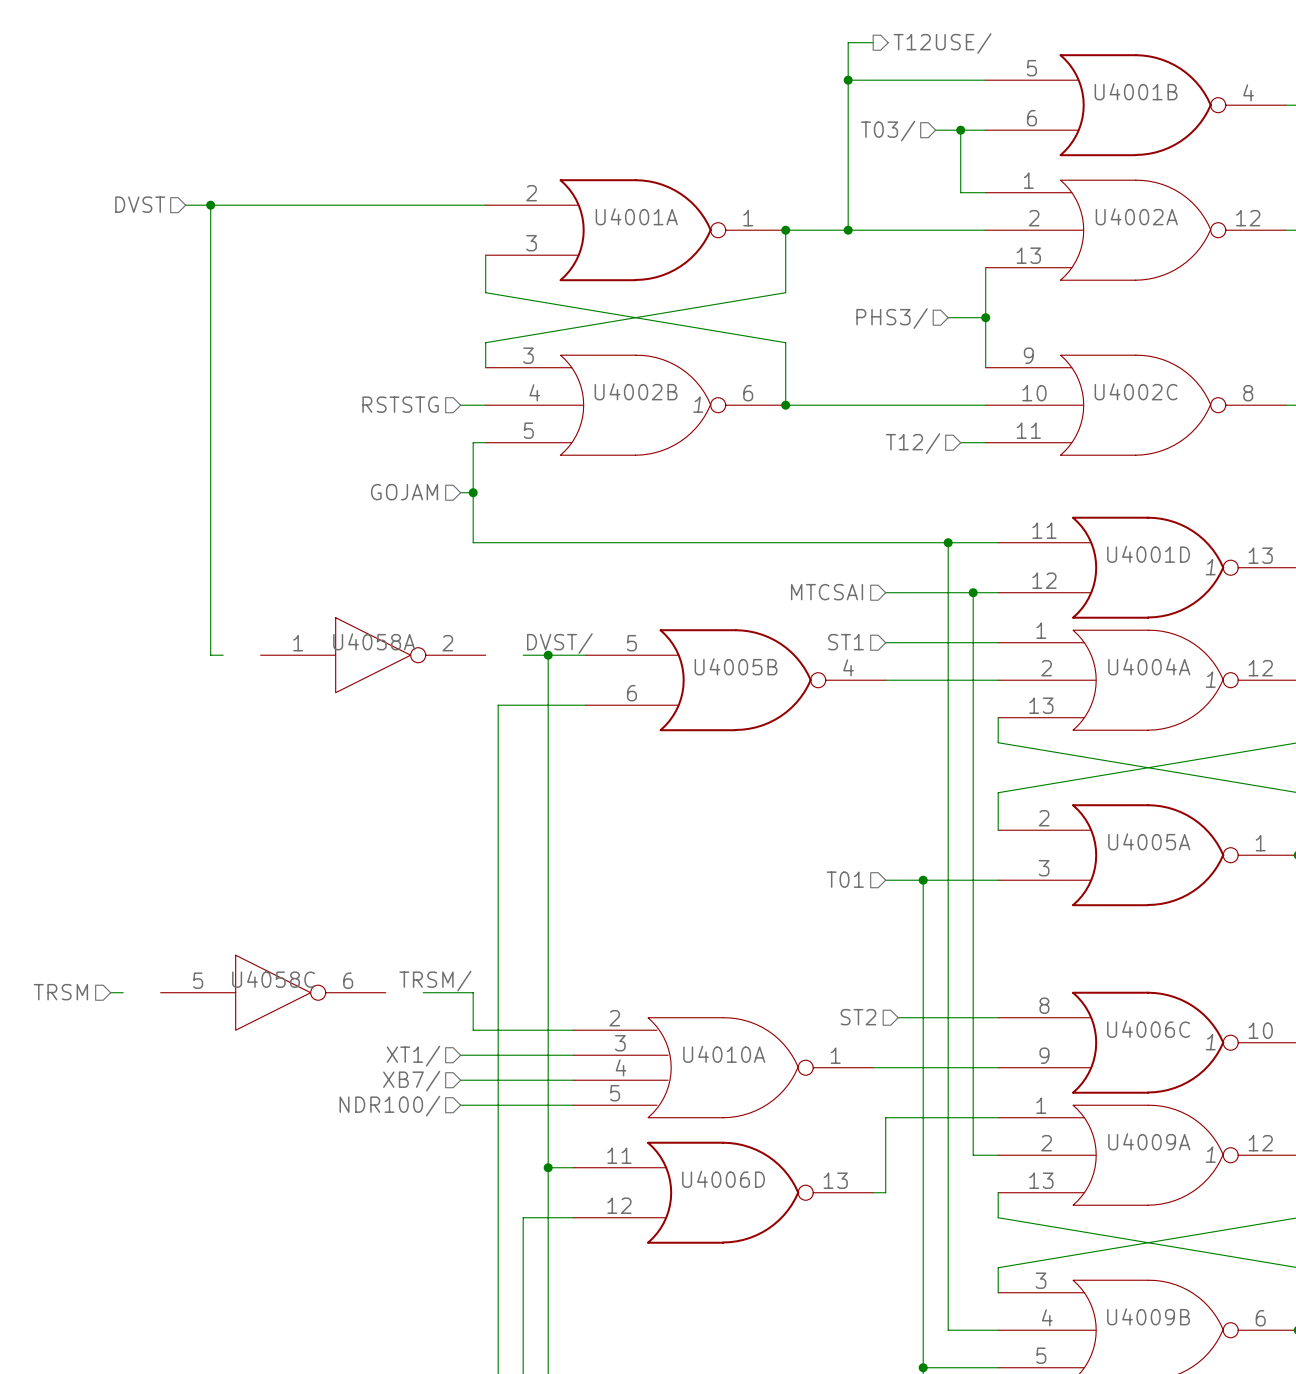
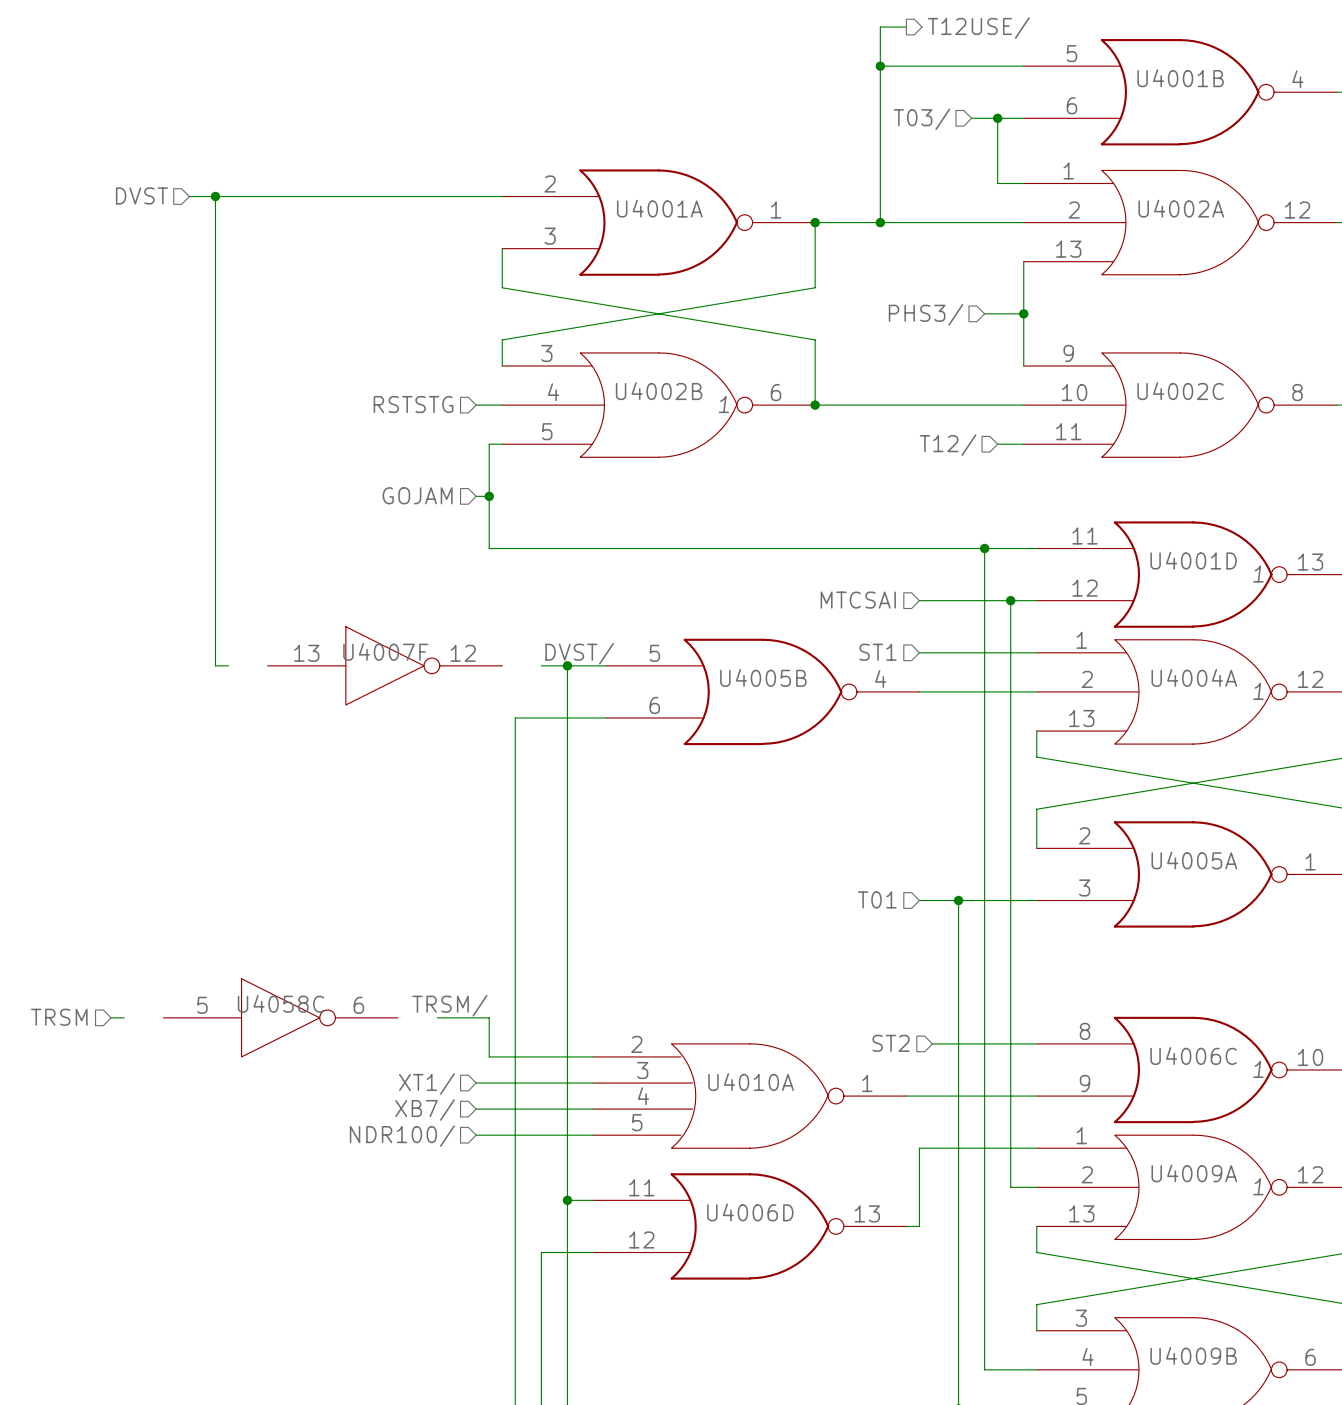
U4058A name: U4058A (374, 641) -> U4007F (385, 651)
U4058A pin number: 1 (298, 643) -> 13 (306, 653)
U4058A pin number: 2 (447, 643) -> 12 (463, 653)

